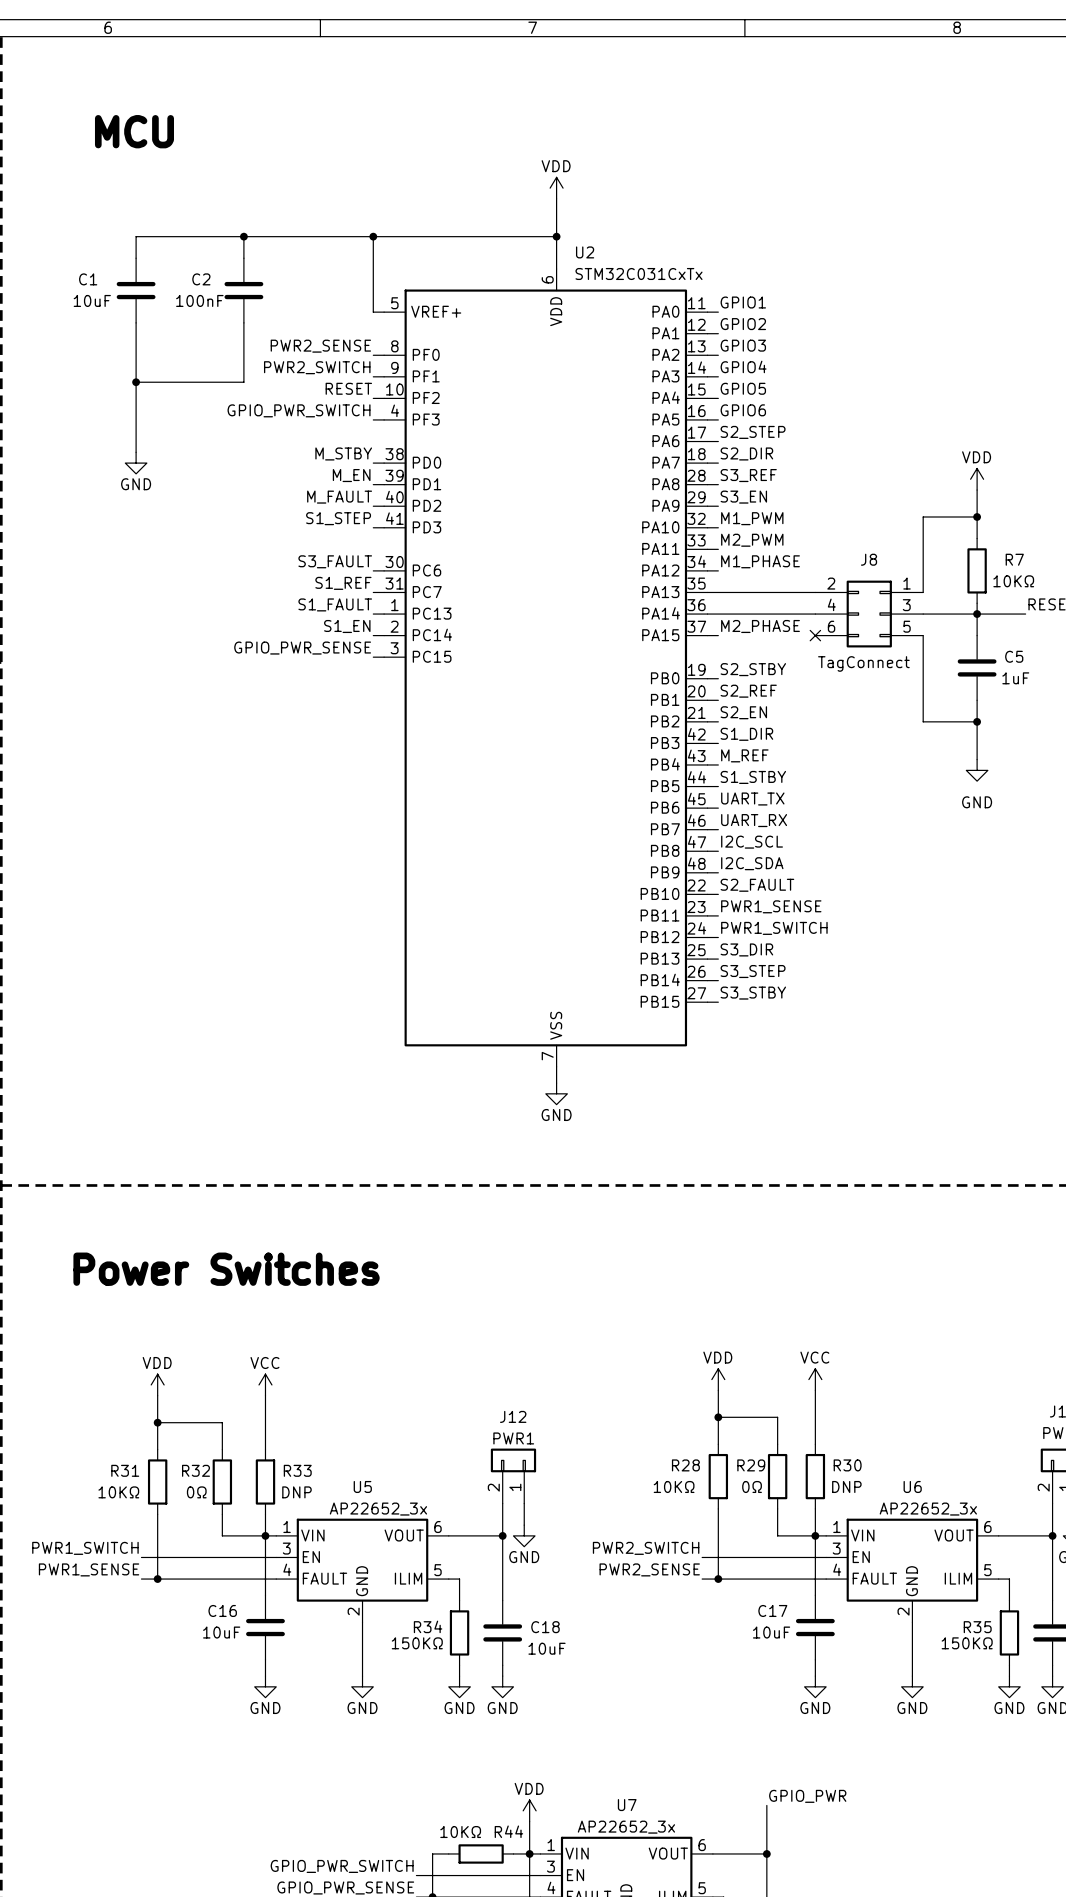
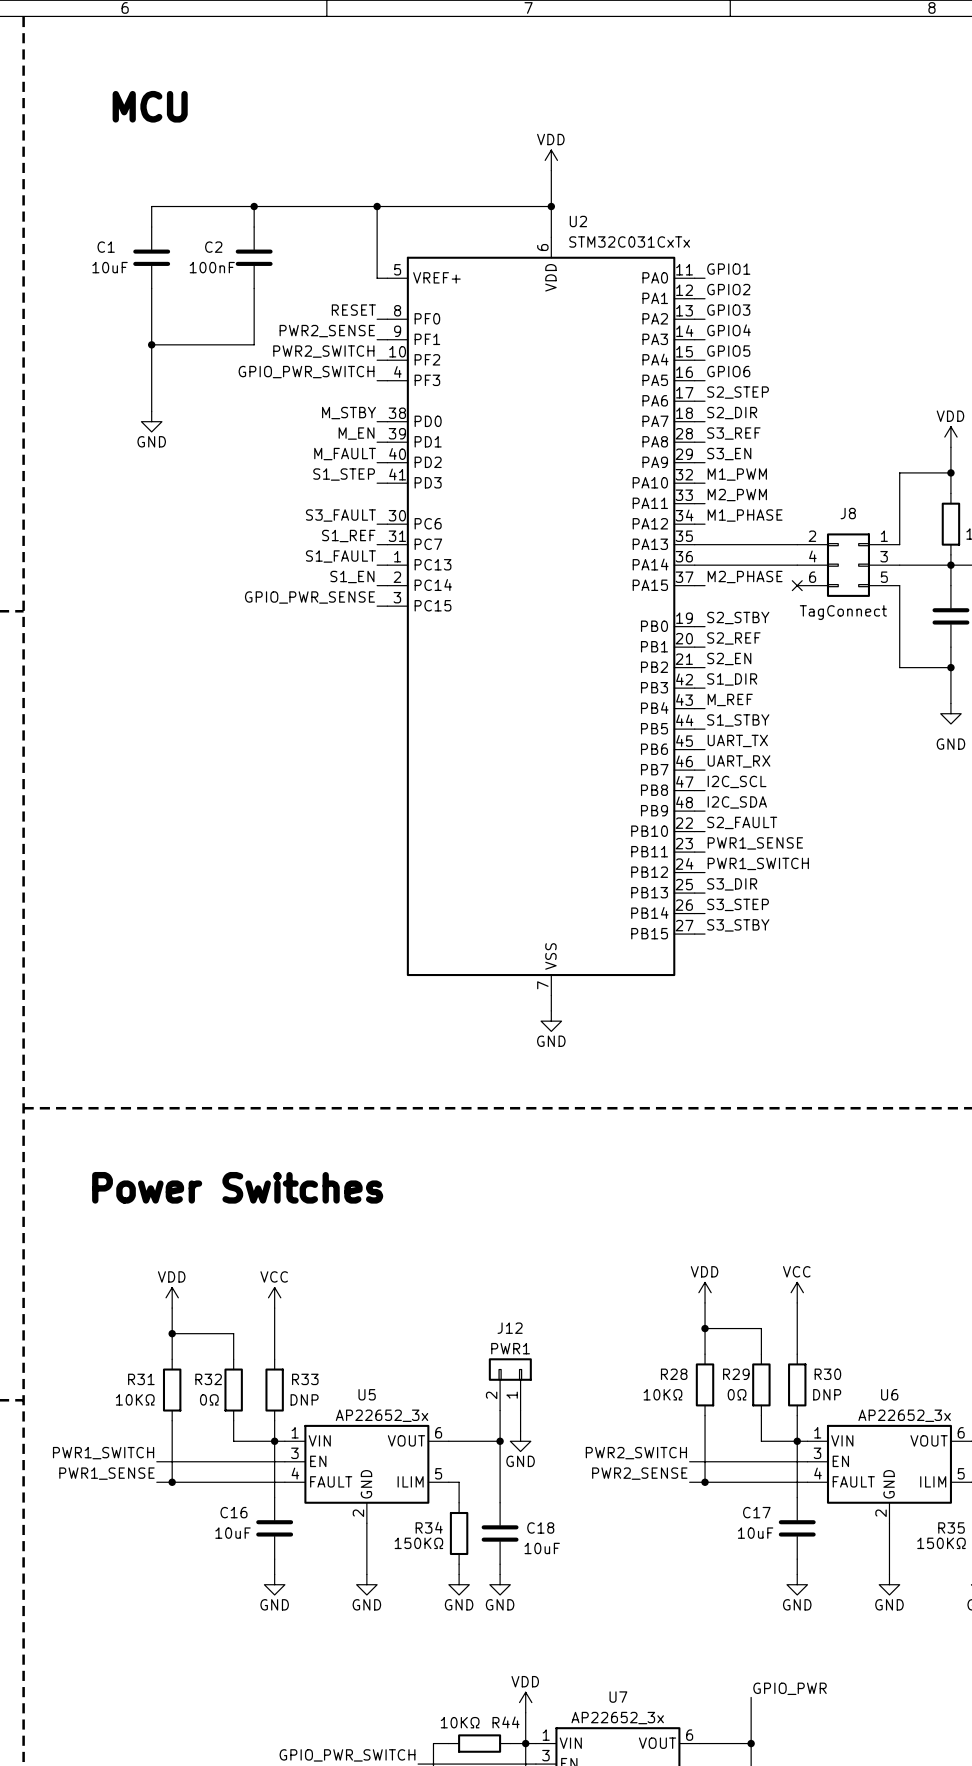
label: PWR2_SENSE (320, 346) -> RESET (353, 310)
label: PWR2_SWITCH (317, 367) -> PWR2_SENSE (327, 331)
label: RESET (348, 388) -> PWR2_SWITCH (323, 351)

